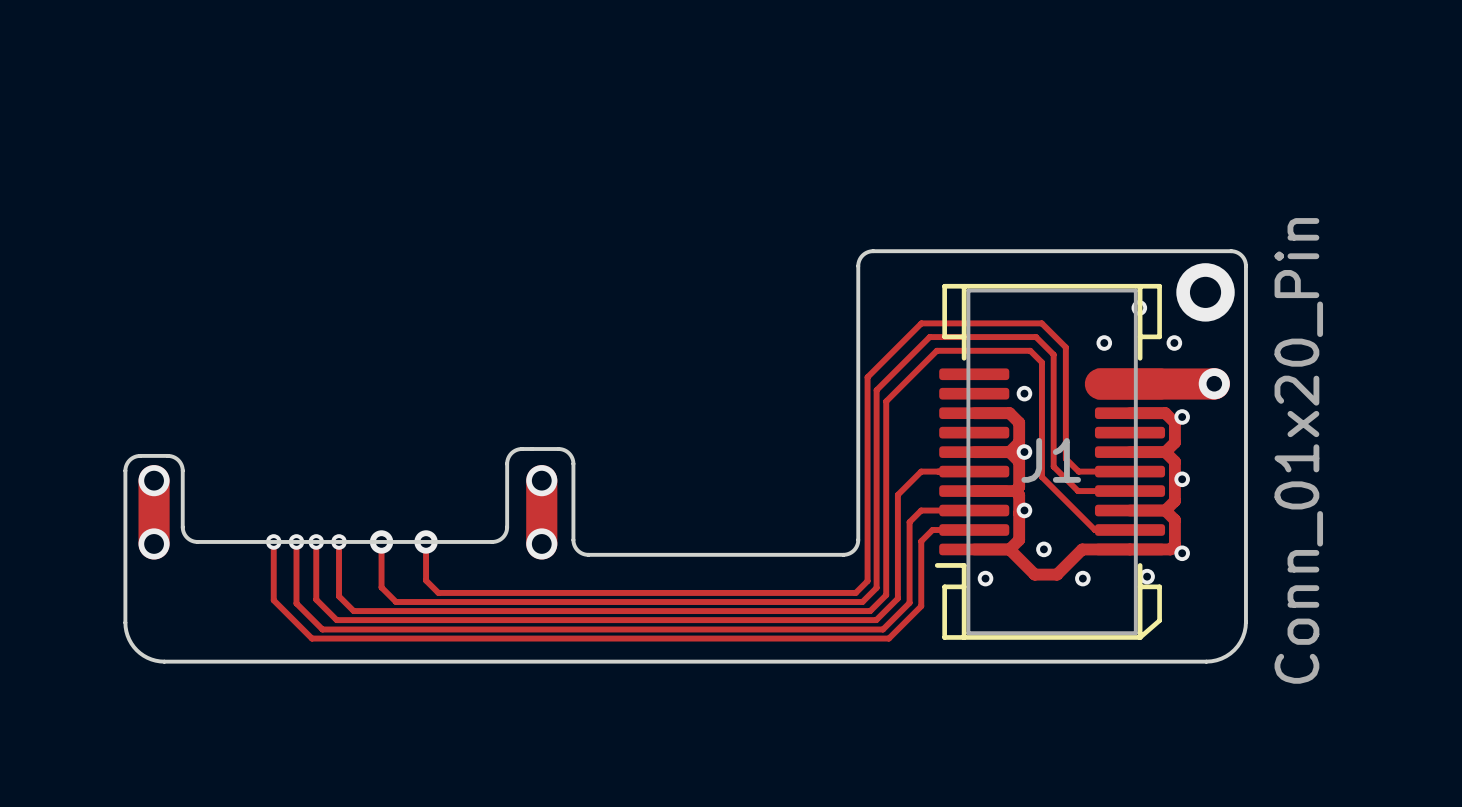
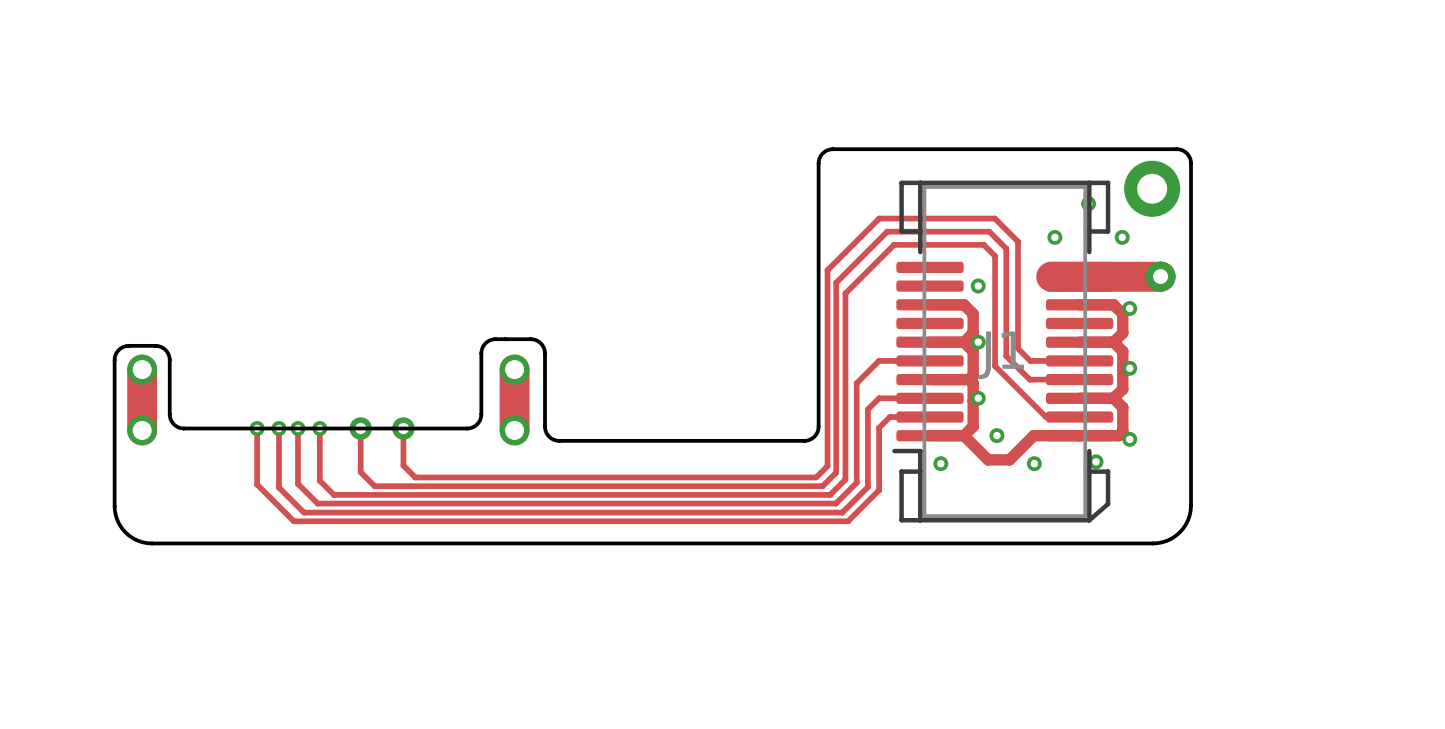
J1 value: Conn_01x20_Pin (1298, 450) -> none

